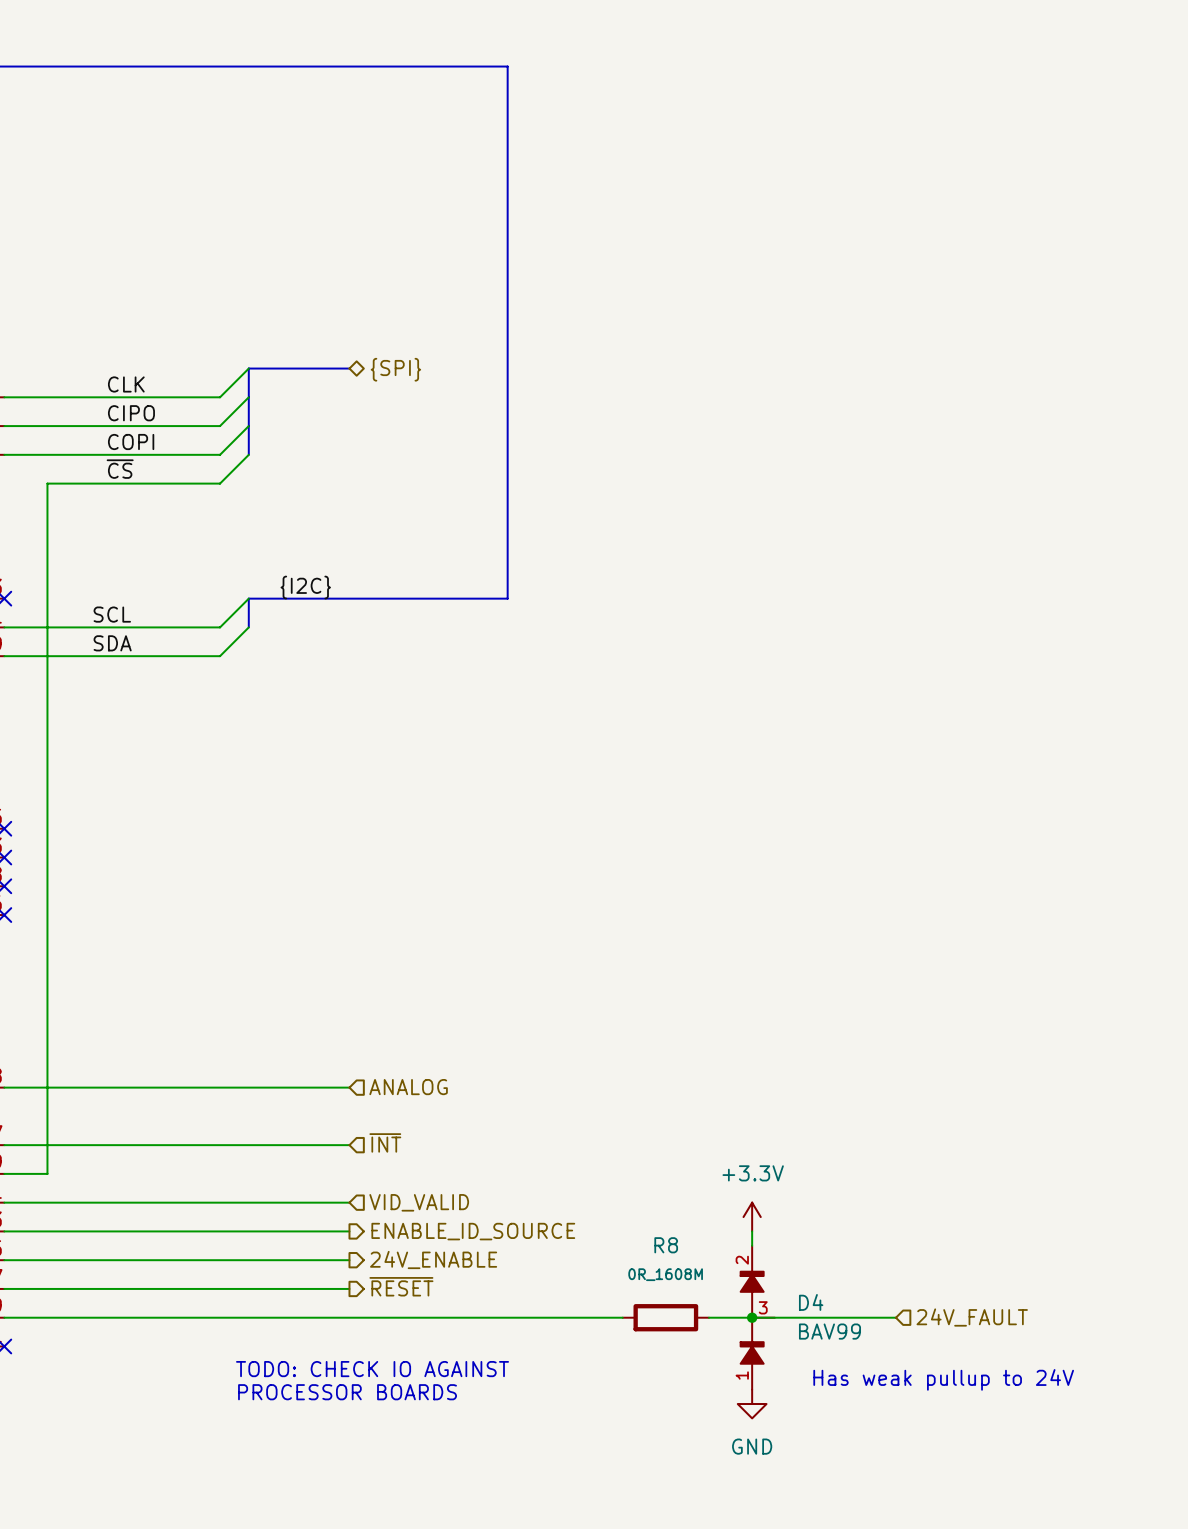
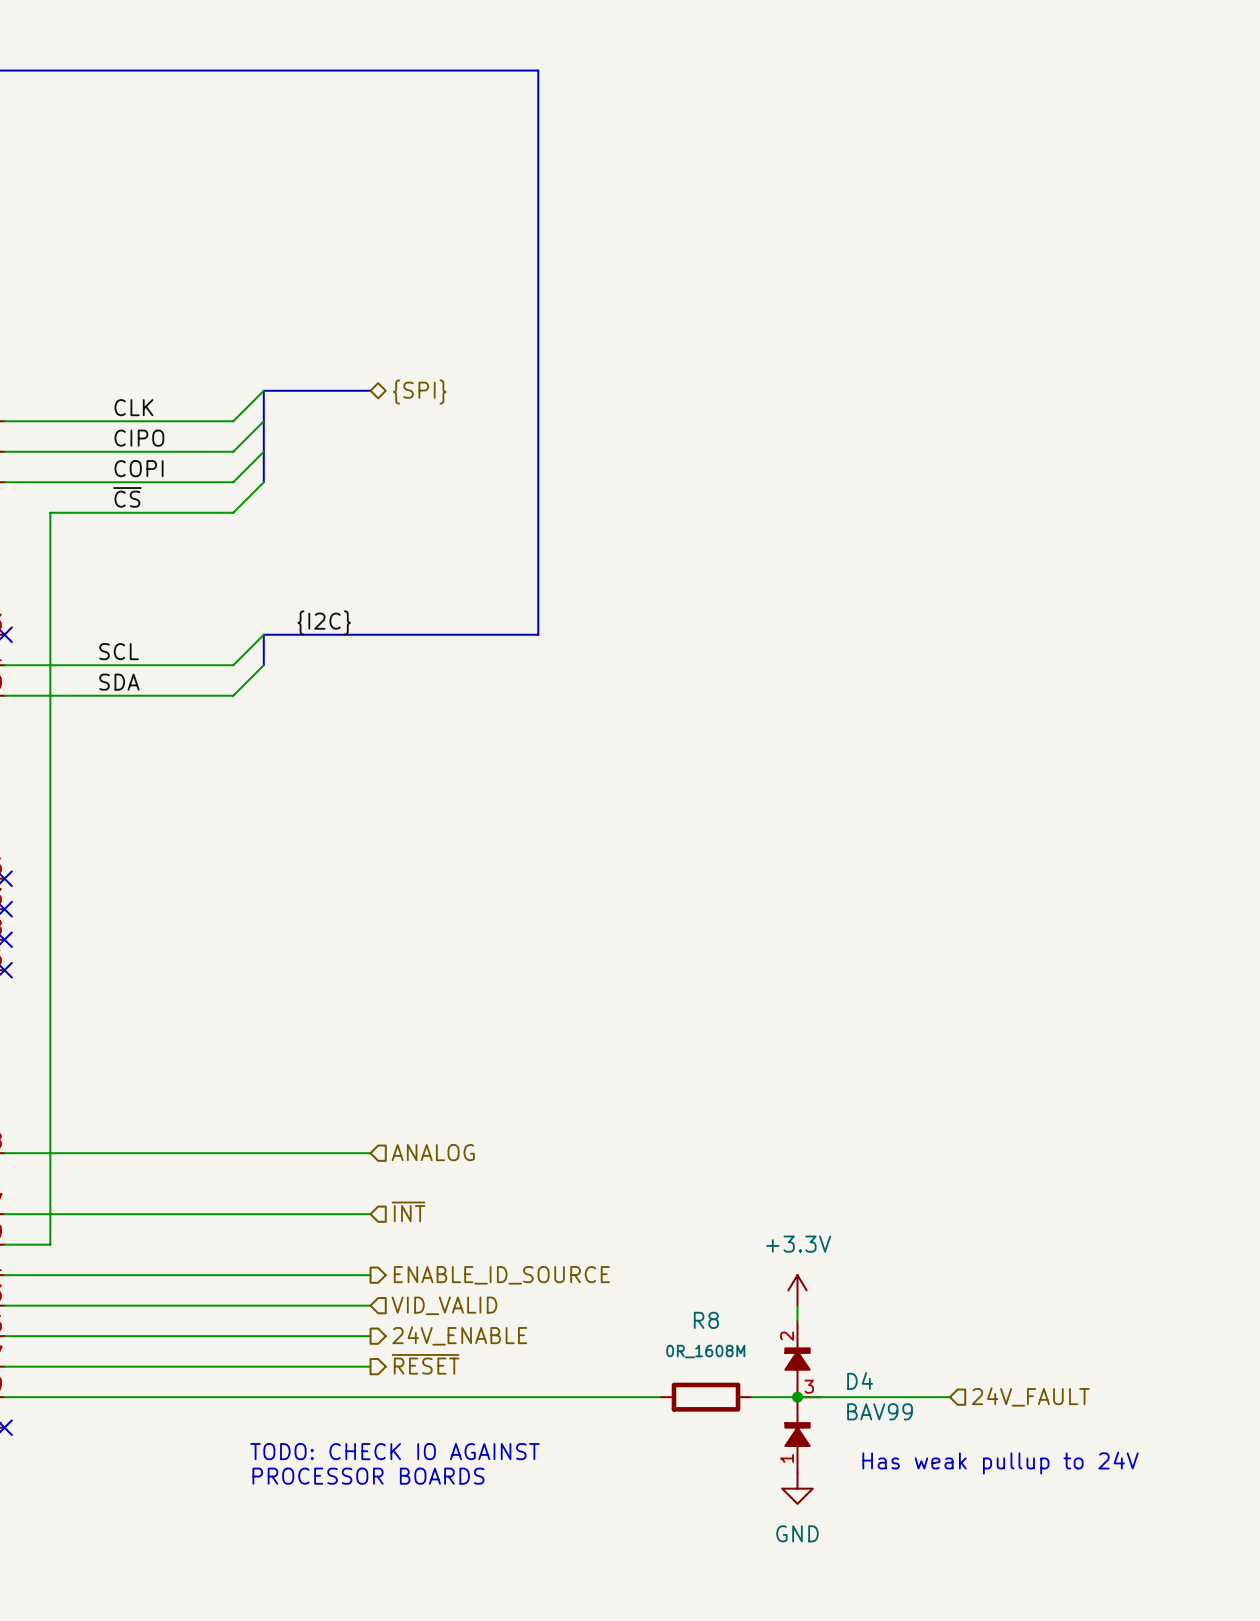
hierarchical label shape: input (419, 1202) -> output (501, 1275)
hierarchical label: VID_VALID (419, 1202) -> ENABLE_ID_SOURCE (501, 1275)
hierarchical label shape: output (473, 1231) -> input (444, 1305)
hierarchical label: ENABLE_ID_SOURCE (473, 1231) -> VID_VALID (444, 1305)

